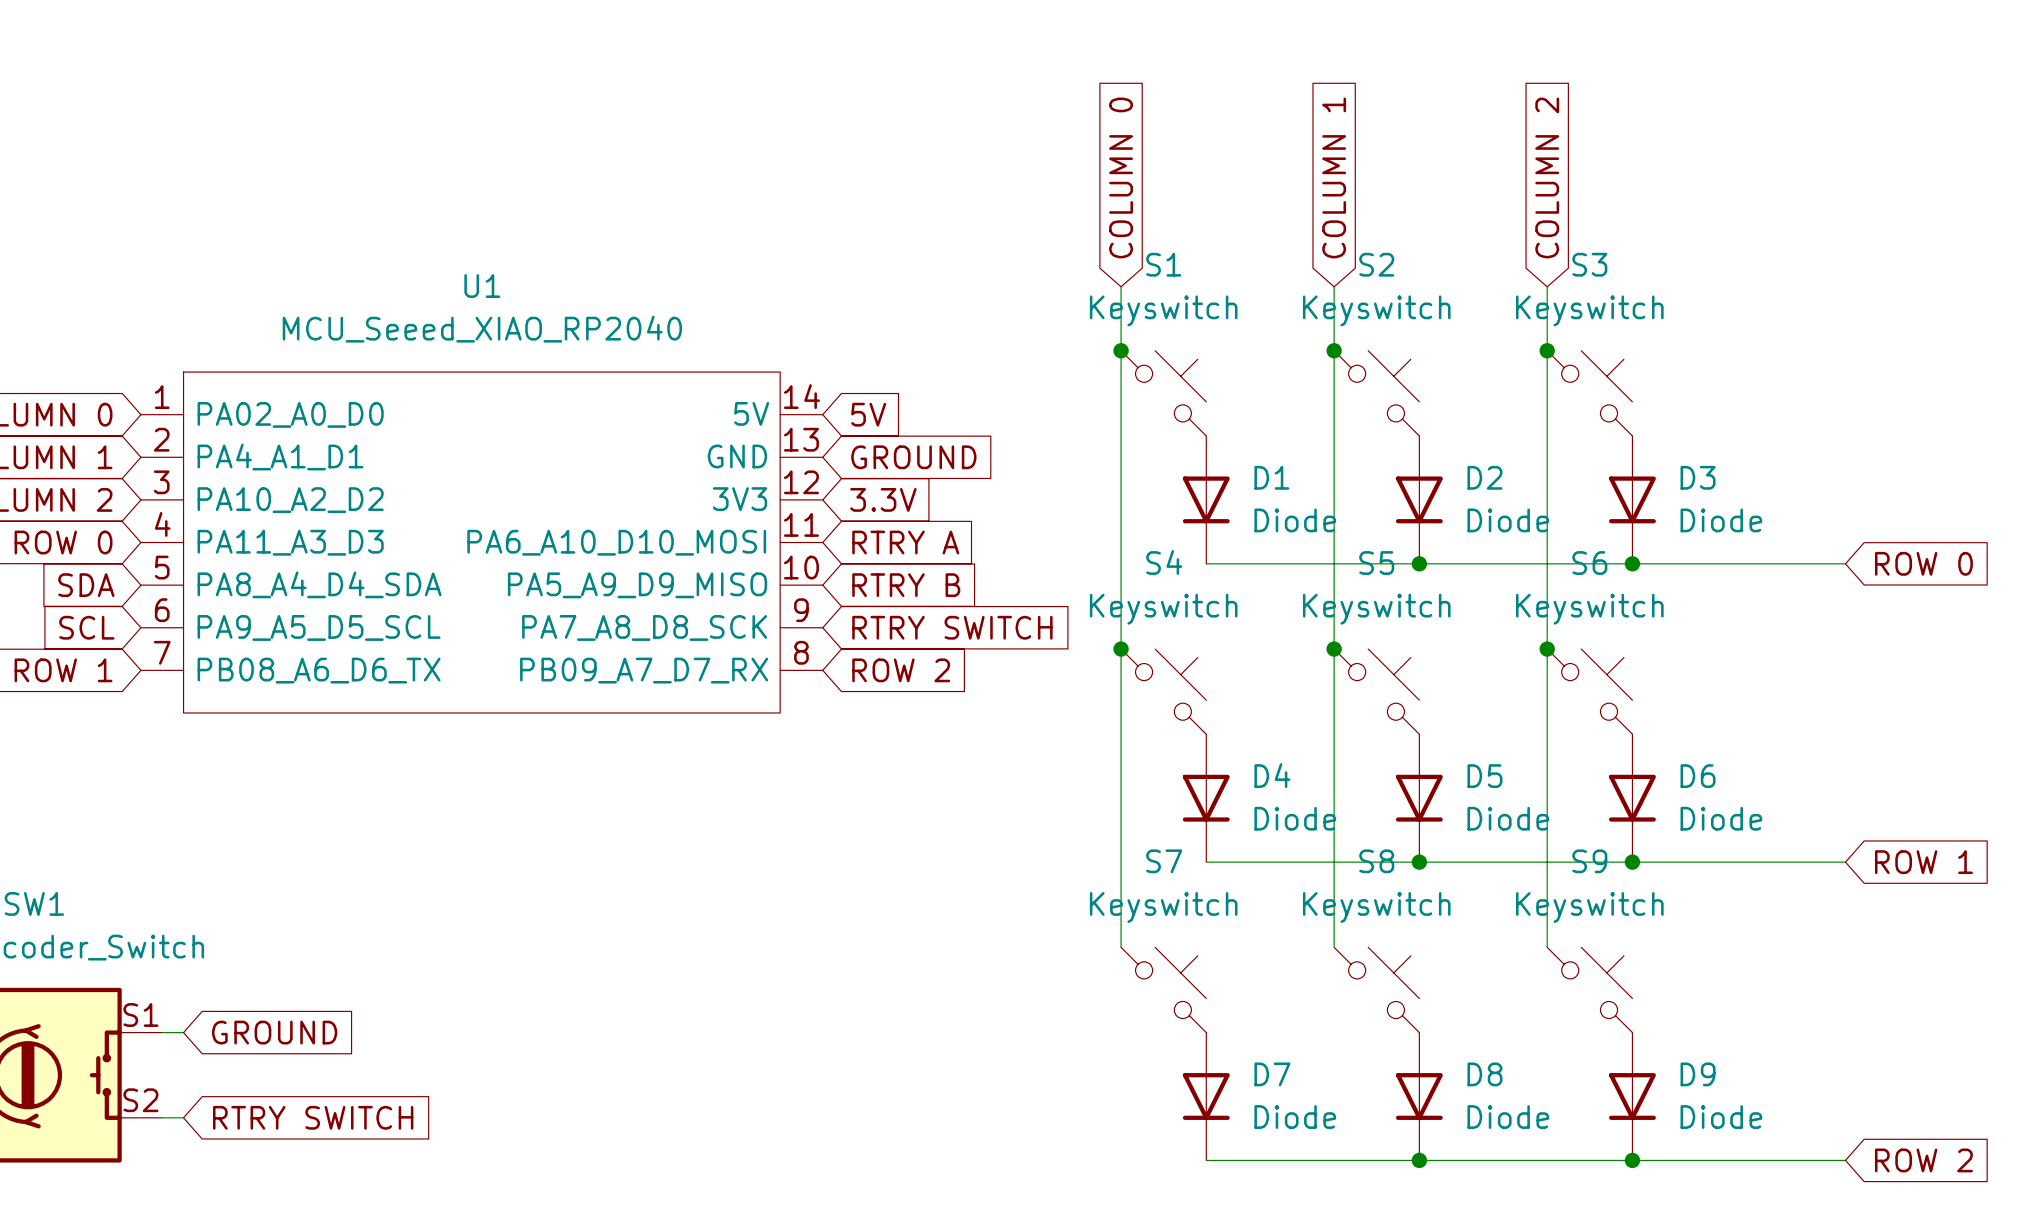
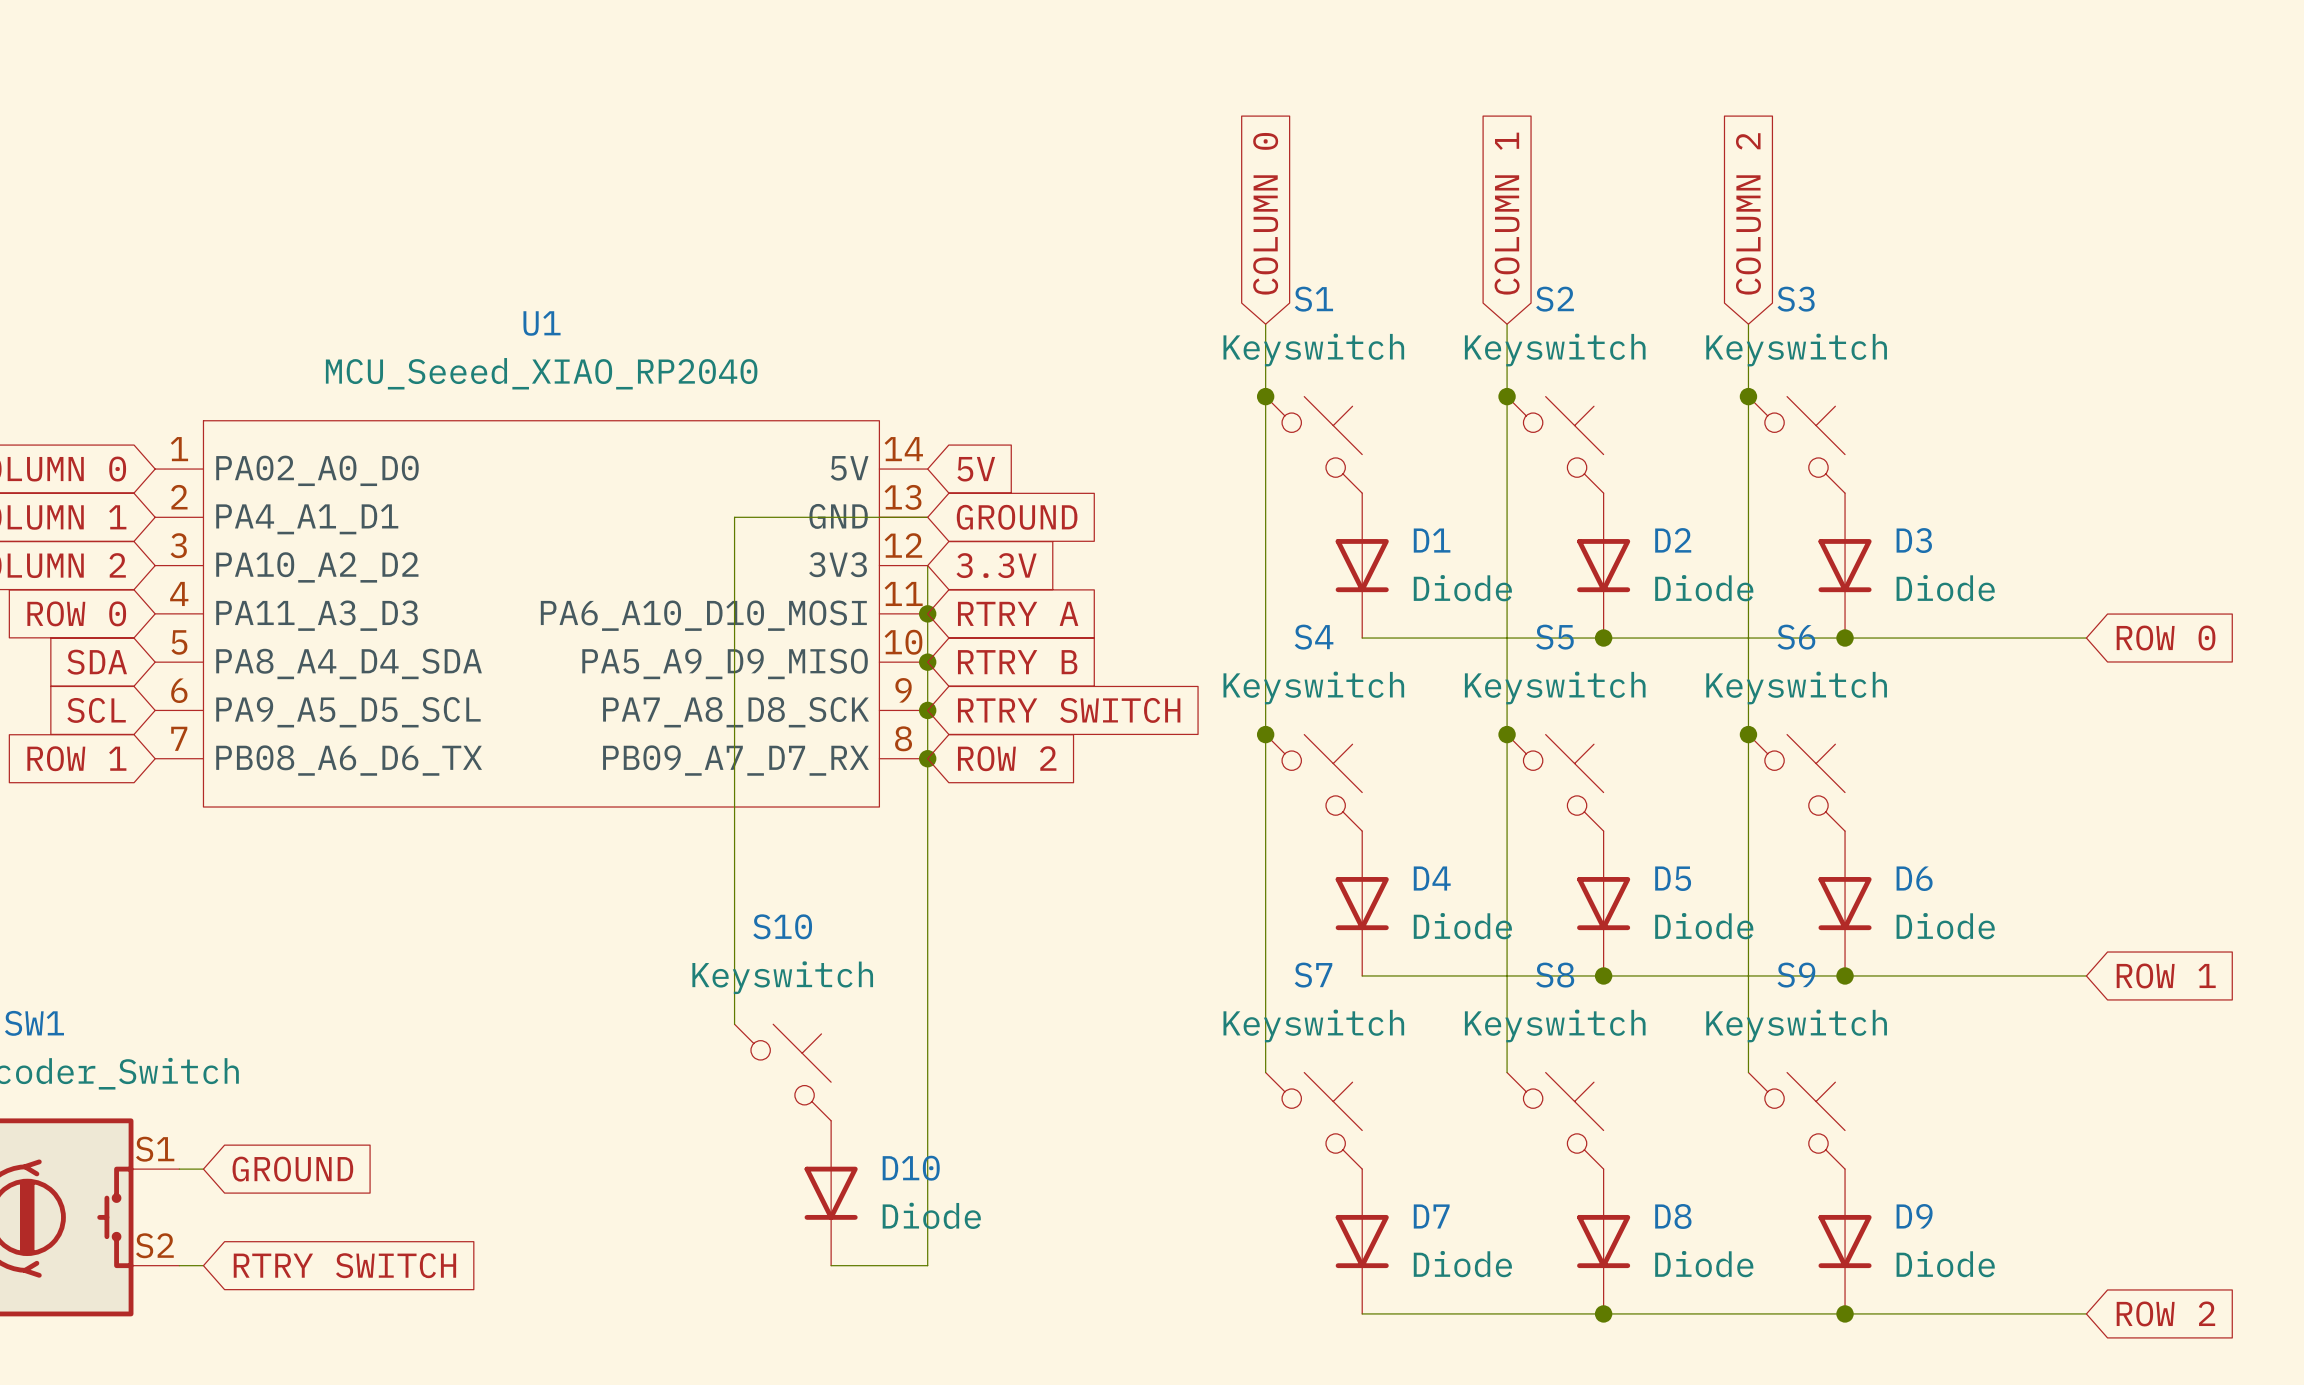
wire: none -> (927, 517) (734, 517) (734, 1024)
wire: none -> (927, 565) (927, 1265) (831, 1265)
junction: none -> (927, 613)
junction: none -> (927, 662)
junction: none -> (927, 710)
junction: none -> (927, 758)
S10: none -> Keyswitch (782, 1072)
D10: none -> Diode (831, 1193)

